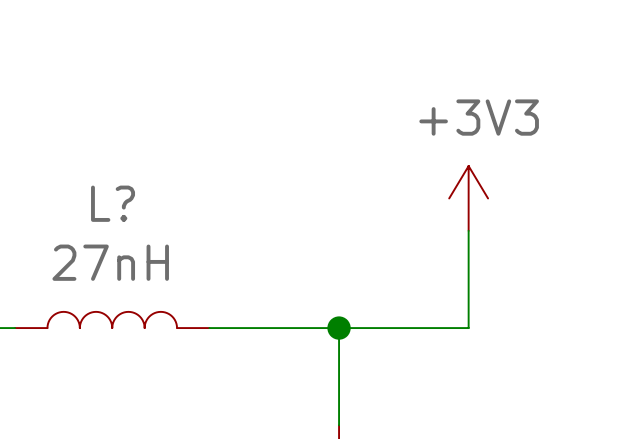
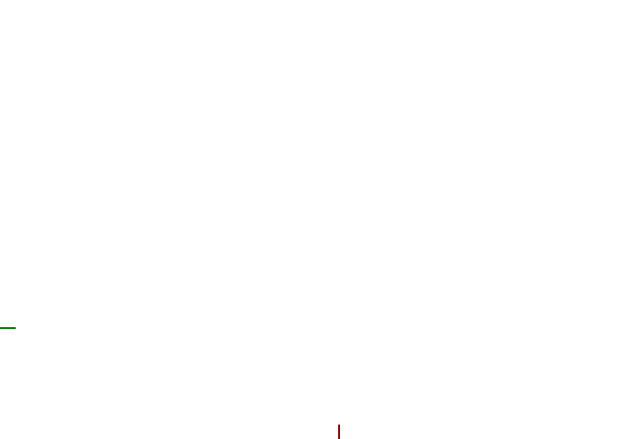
power symbol: +3V3 (468, 198) -> none
wire: (468, 230) (468, 328) (209, 328) -> none
L?: 27nH (112, 319) -> none
wire: (339, 328) (339, 425) -> none
junction: (339, 328) -> none

